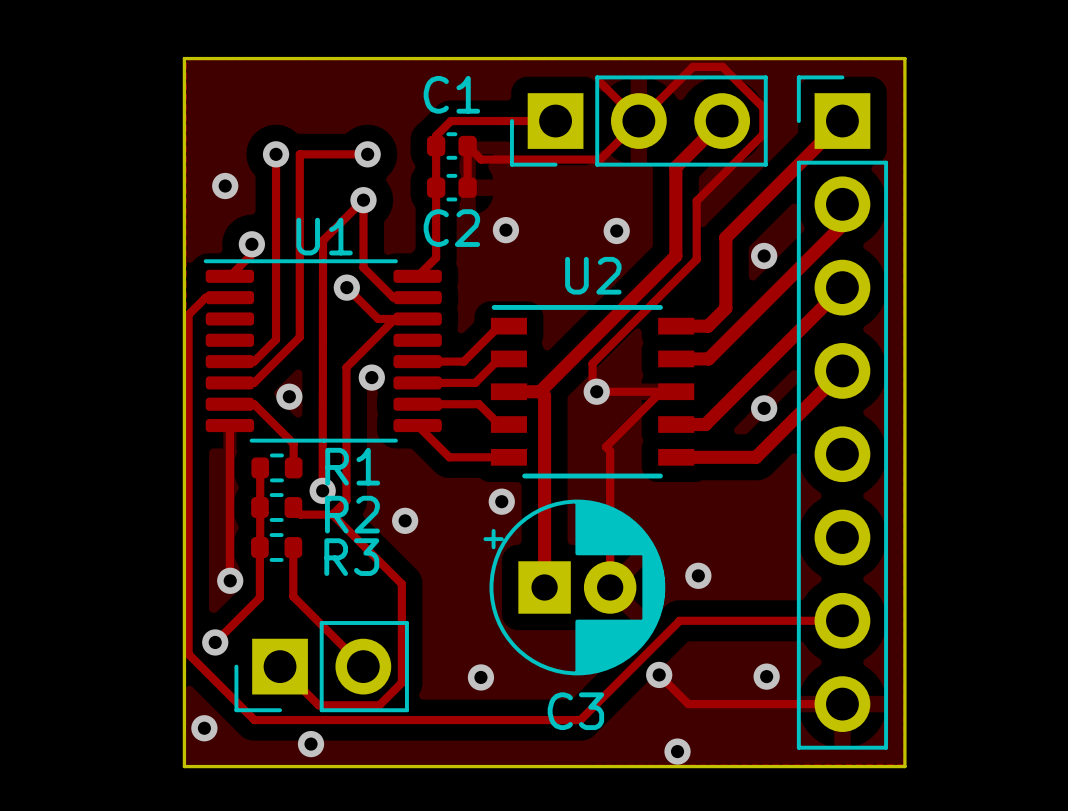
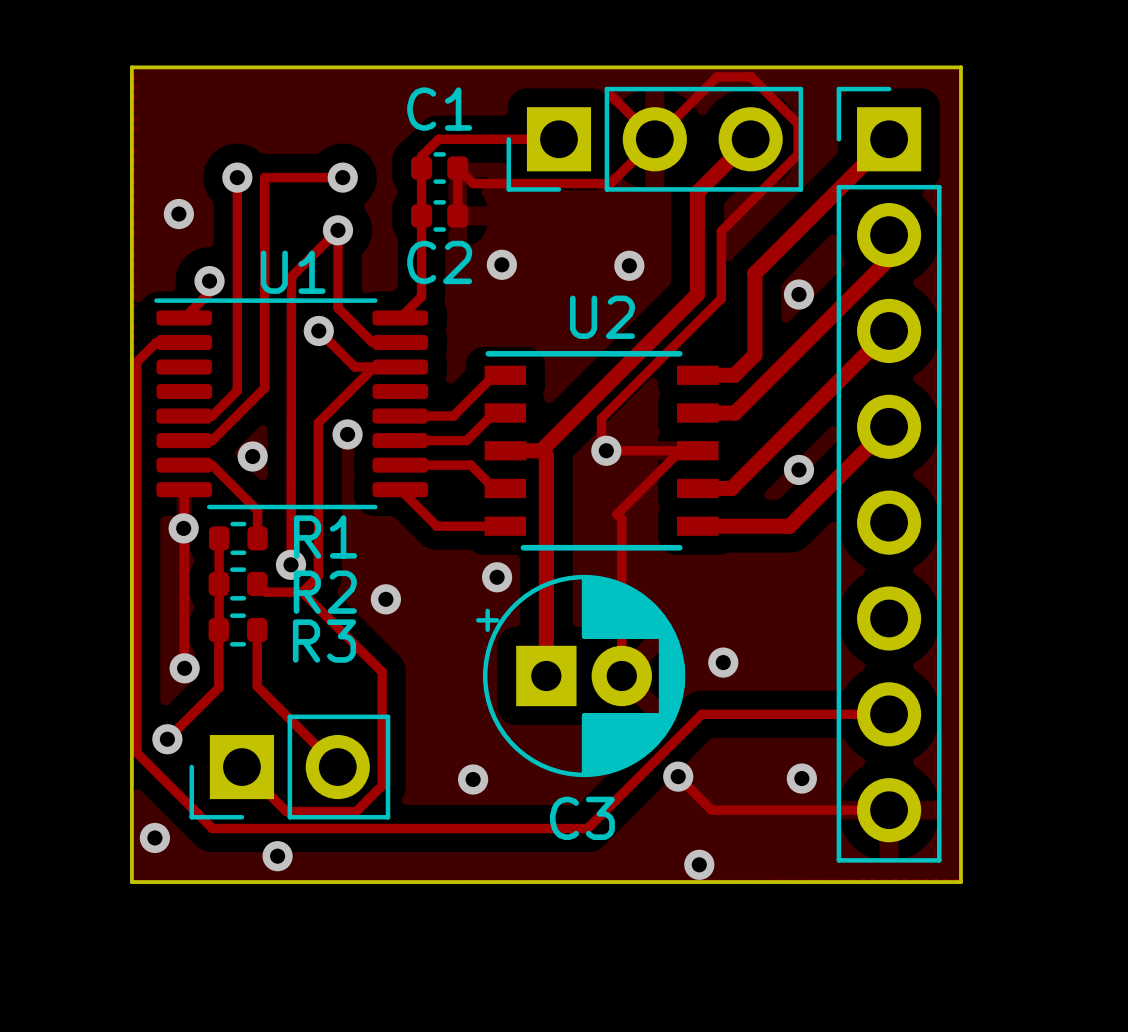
via: none -> (183, 528)

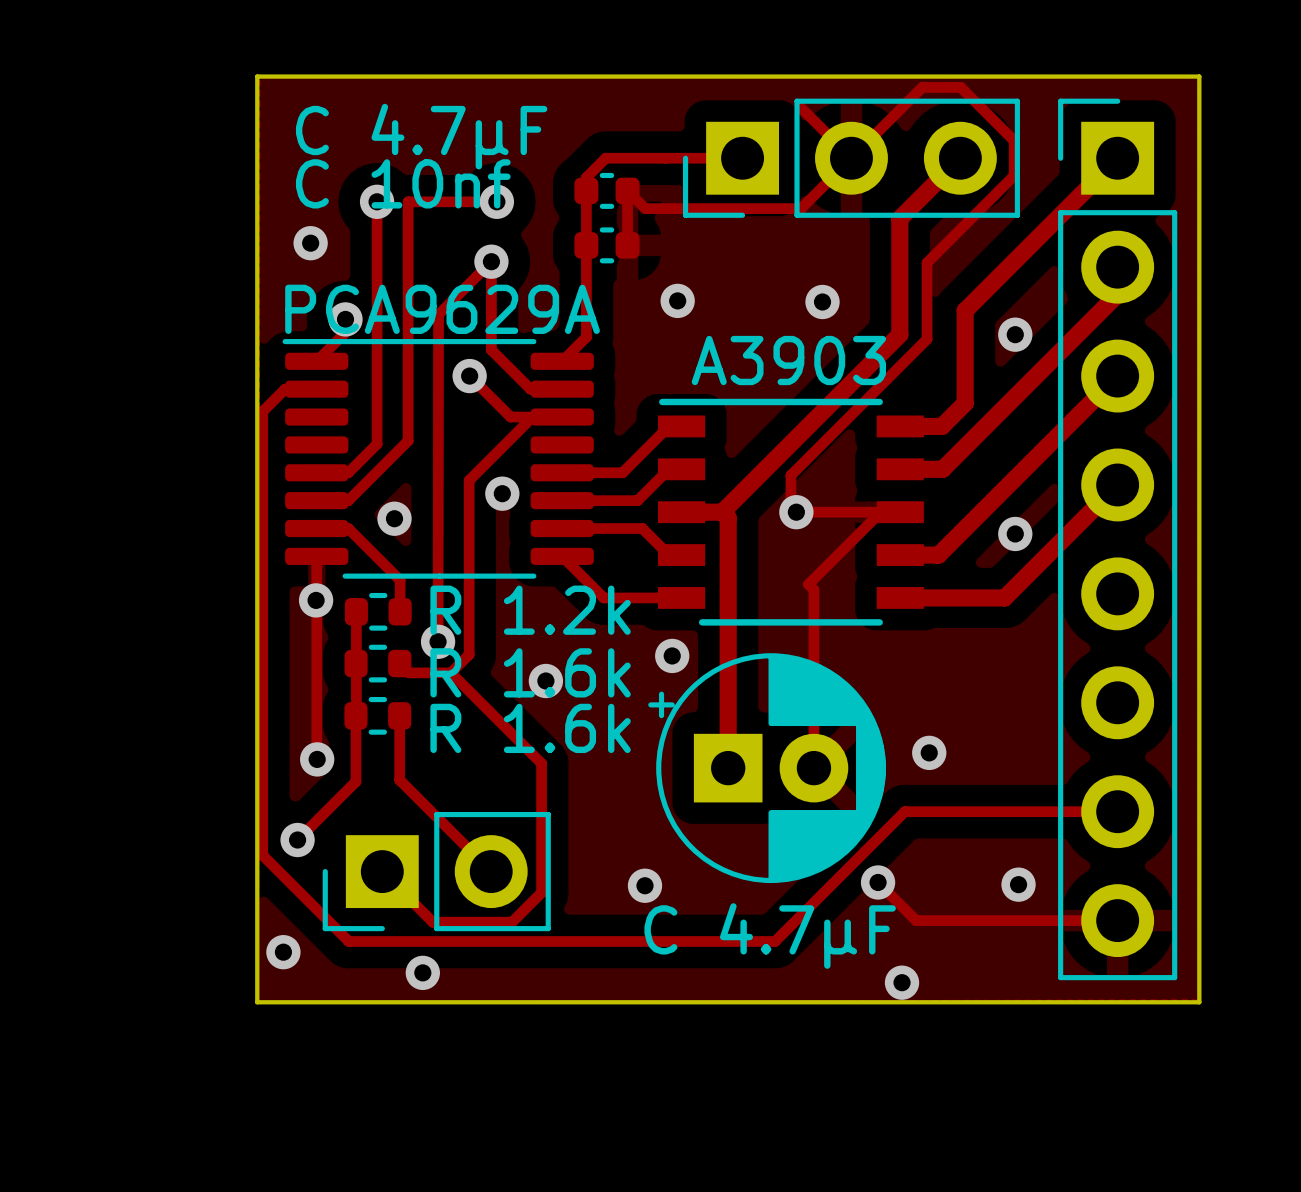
C1 name: C1 (439, 109) -> C 4.7μF (421, 136)
C2 name: C2 (439, 262) -> C 10nf (403, 183)
U1 name: U1 (293, 272) -> PCA9629A (442, 309)
U2 name: U2 (602, 317) -> A3903 (788, 360)
R1 name: R1 (325, 537) -> R 1.2k (530, 610)
R2 name: R2 (325, 592) -> R 1.6k (530, 672)
R3 name: R3 (324, 641) -> R 1.6k (530, 728)
C3 name: C3 (582, 818) -> C 4.7μF (770, 936)

